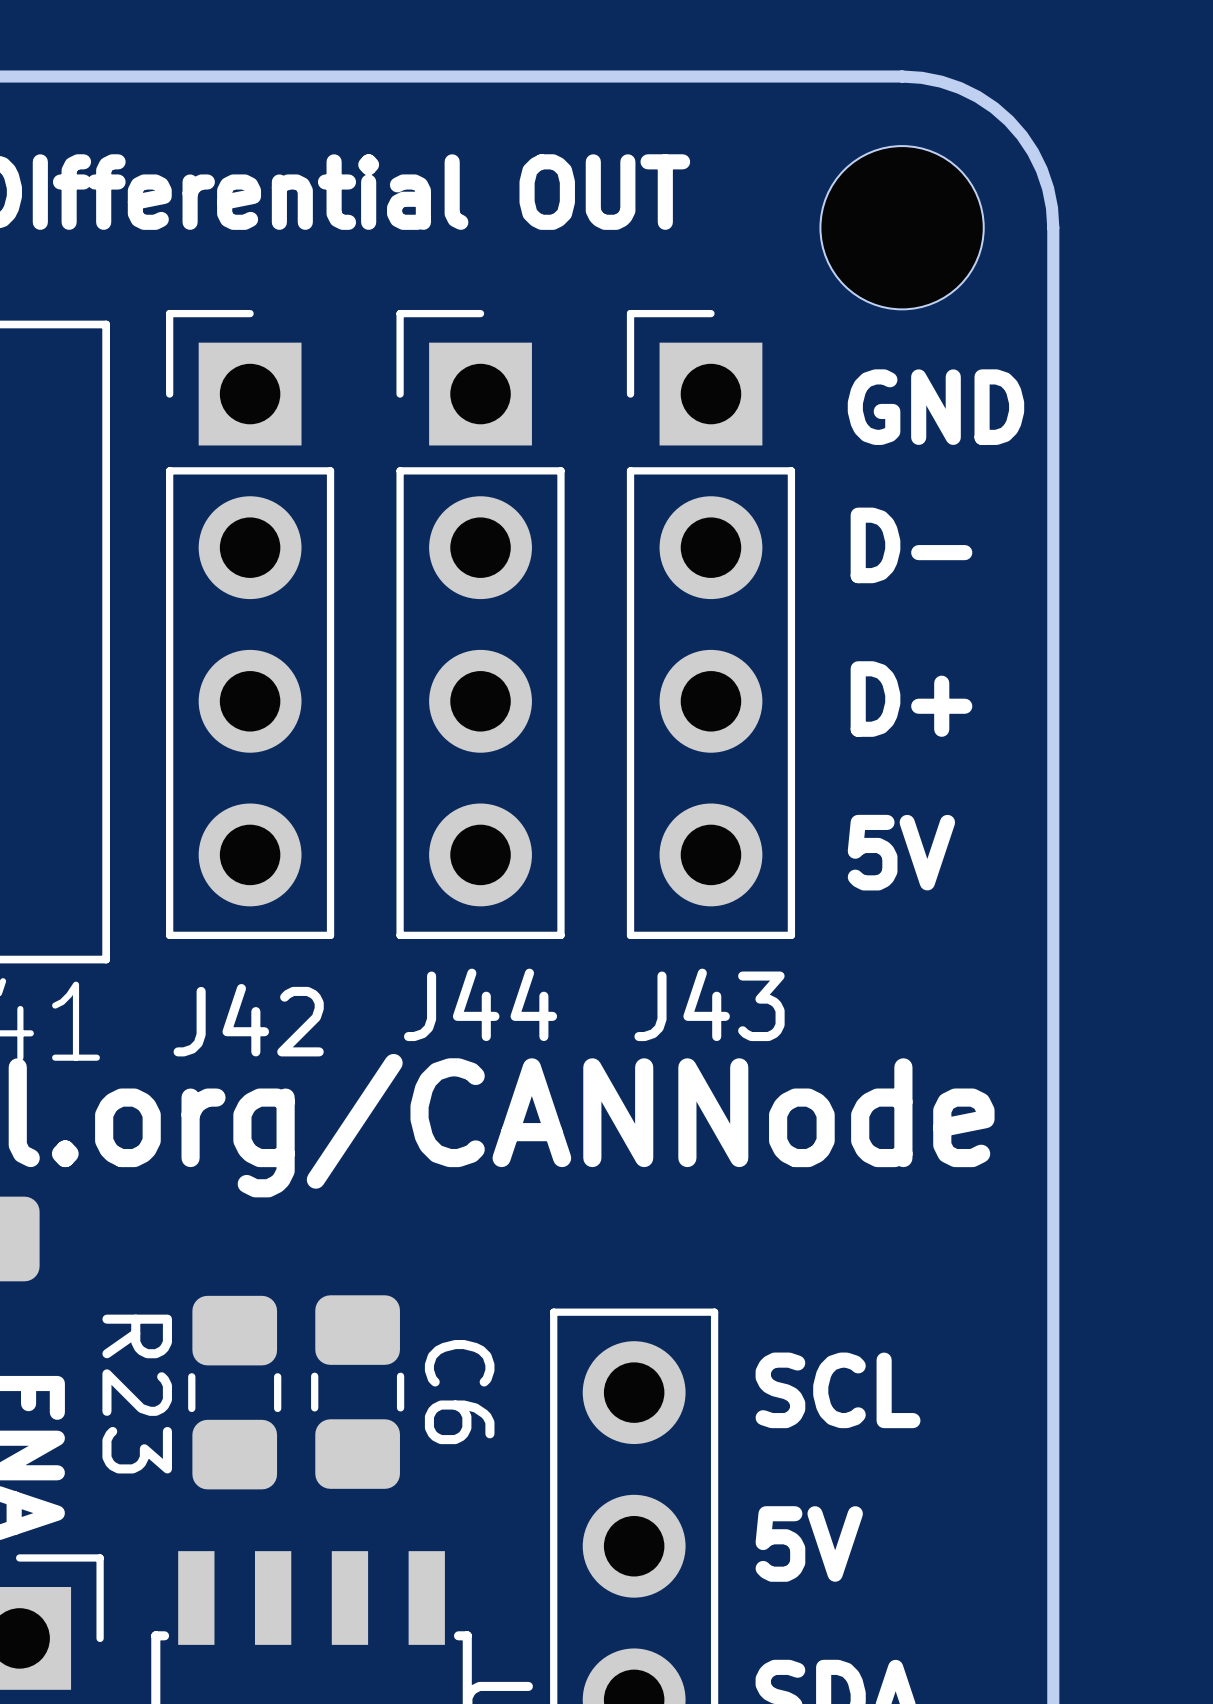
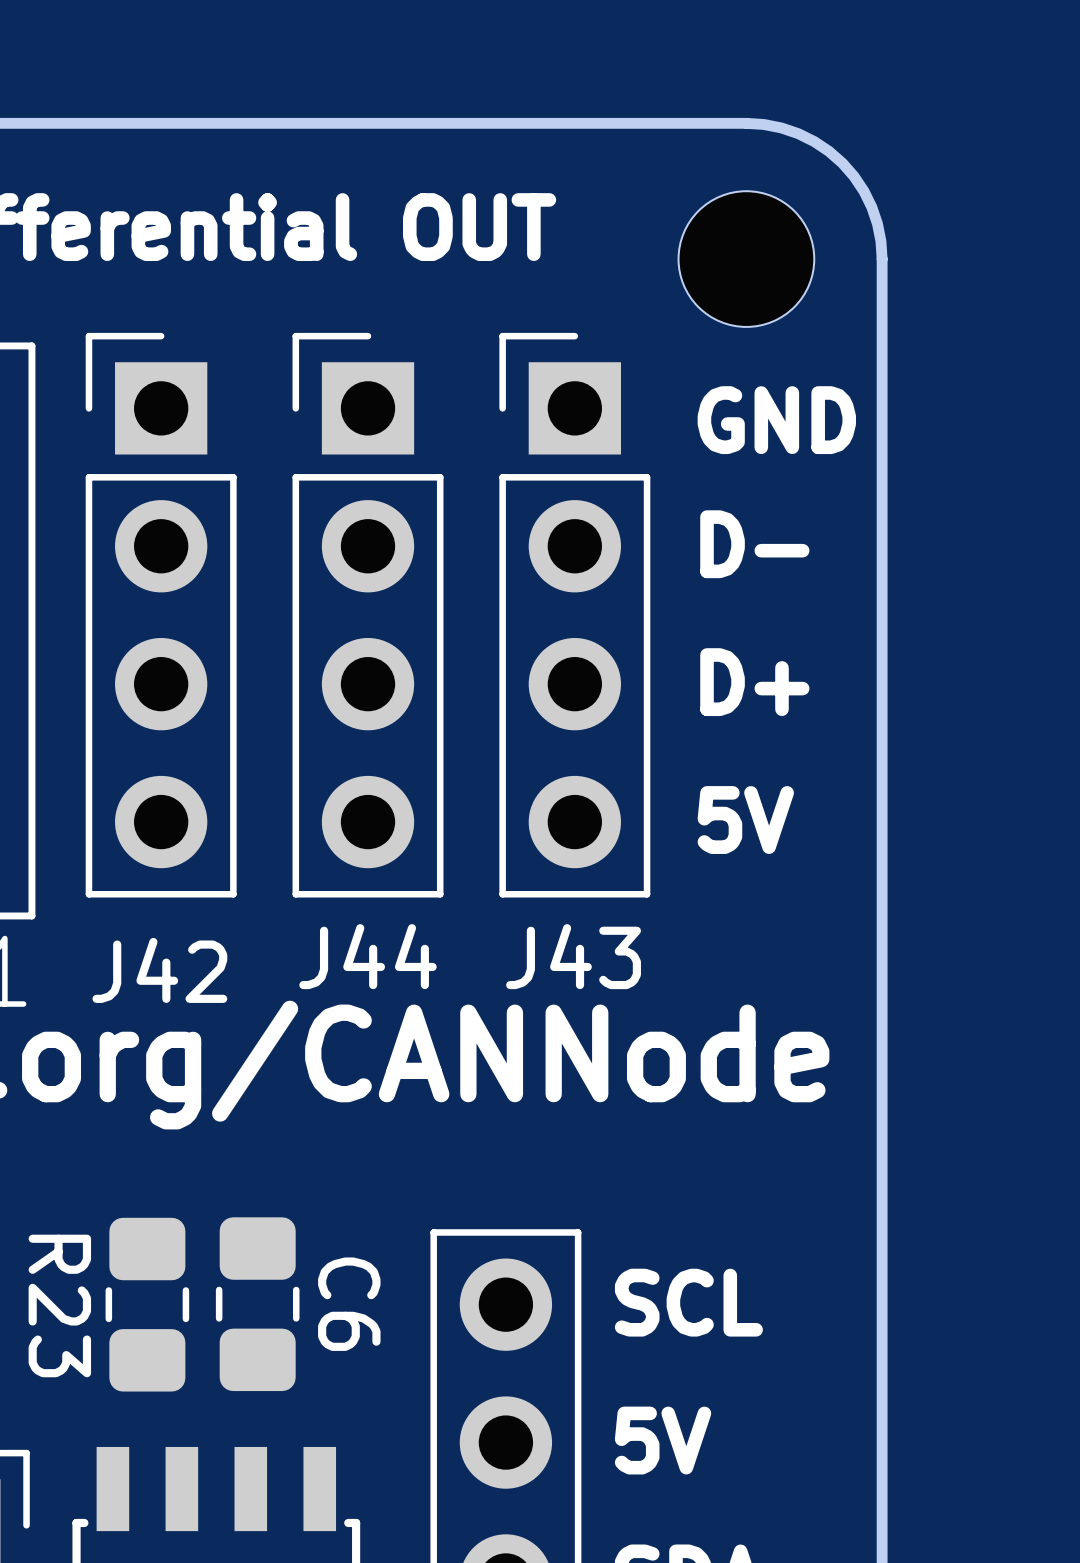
part footprint: [820, 146, 984, 310] -> [678, 191, 815, 327]

